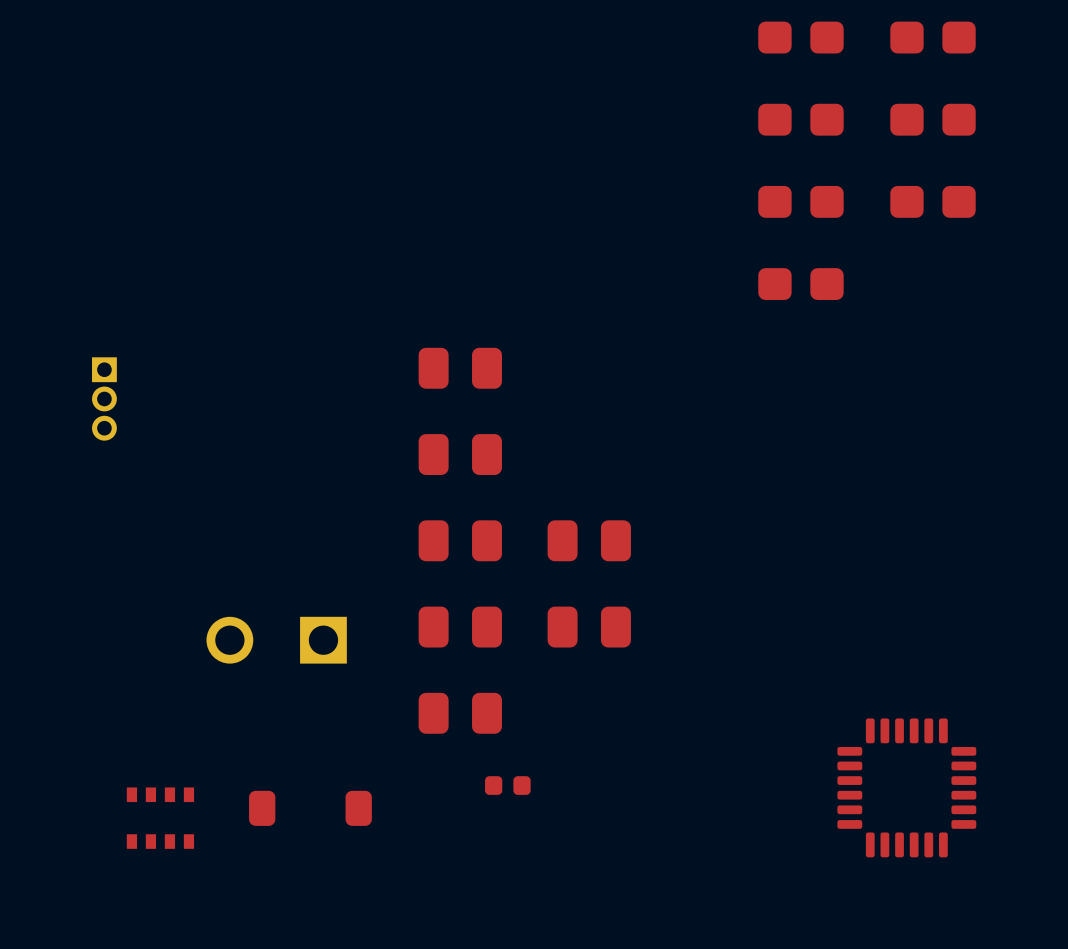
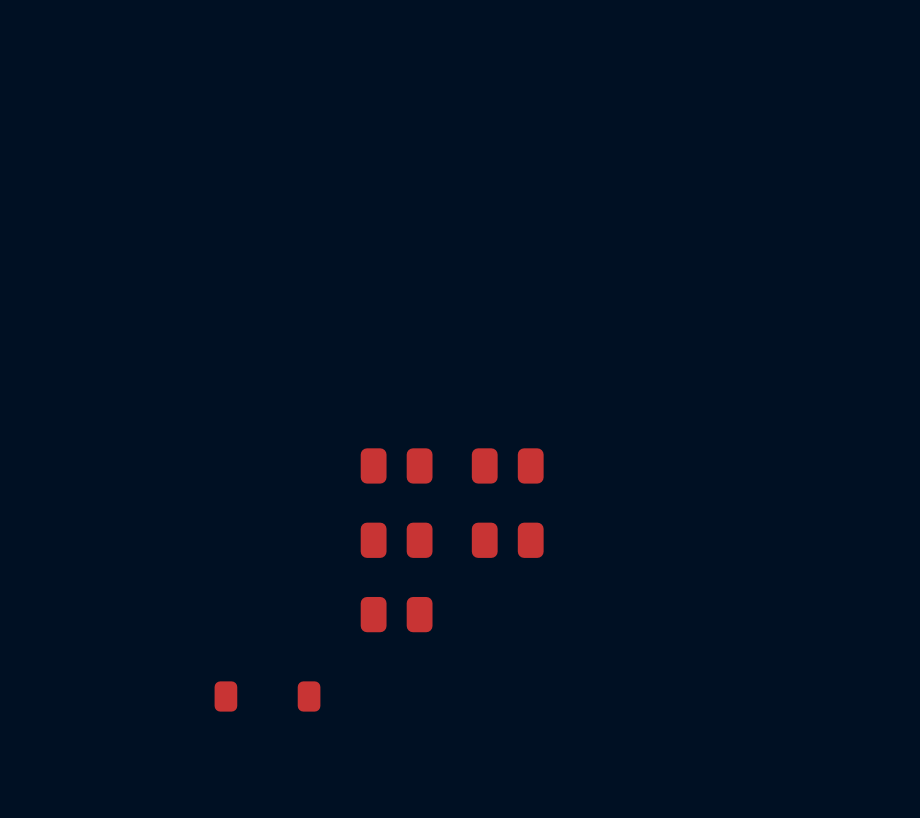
part: (800, 37) -> none
part: (933, 37) -> none
part: (800, 119) -> none
part: (933, 119) -> none
part: (800, 201) -> none
part: (933, 201) -> none
part: (800, 284) -> none
part: (460, 368) -> none
part: (104, 398) -> none
part: (460, 454) -> none
part: (276, 640) -> none
part: (507, 785) -> none
part: (906, 787) -> none
part: (160, 818) -> none

